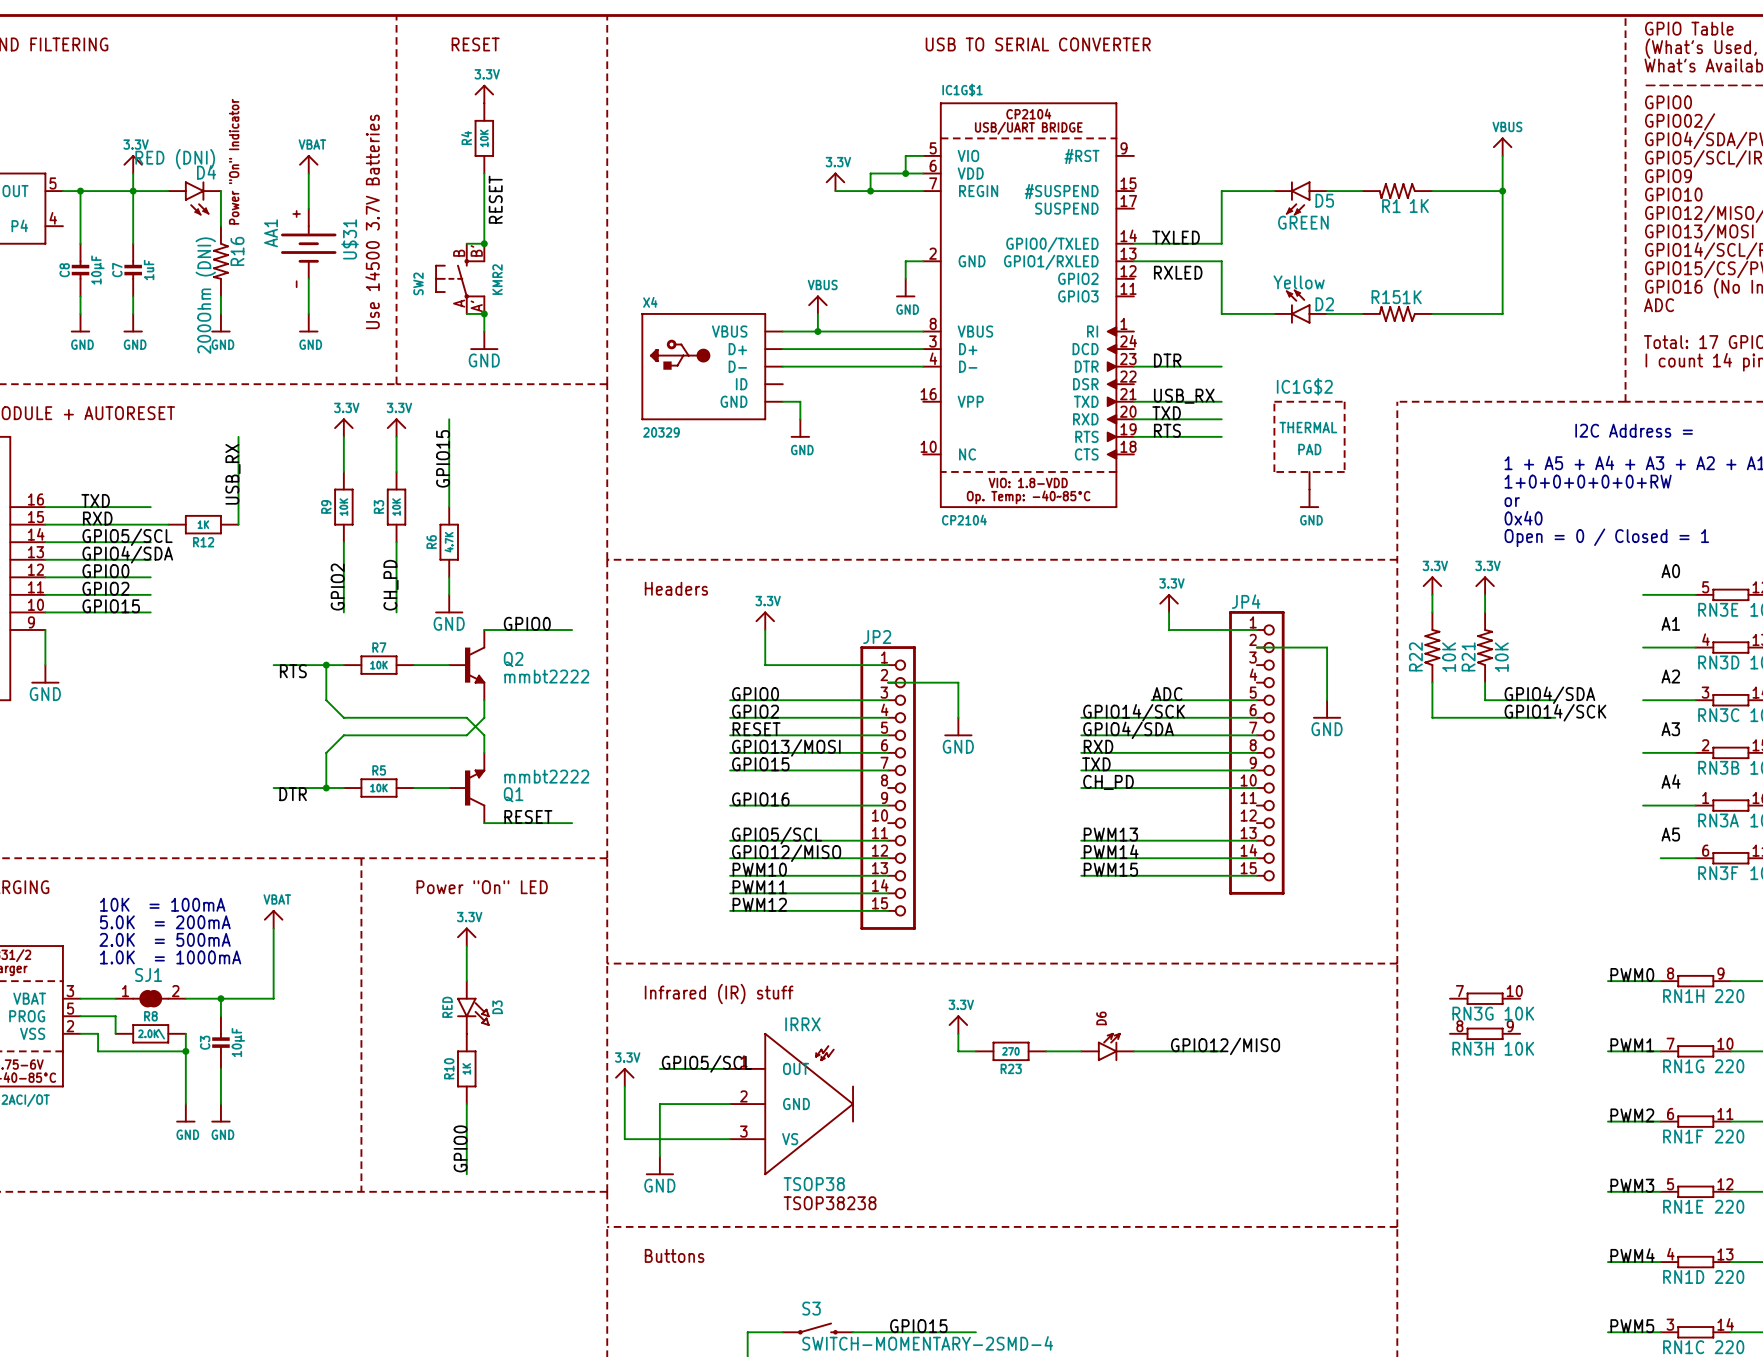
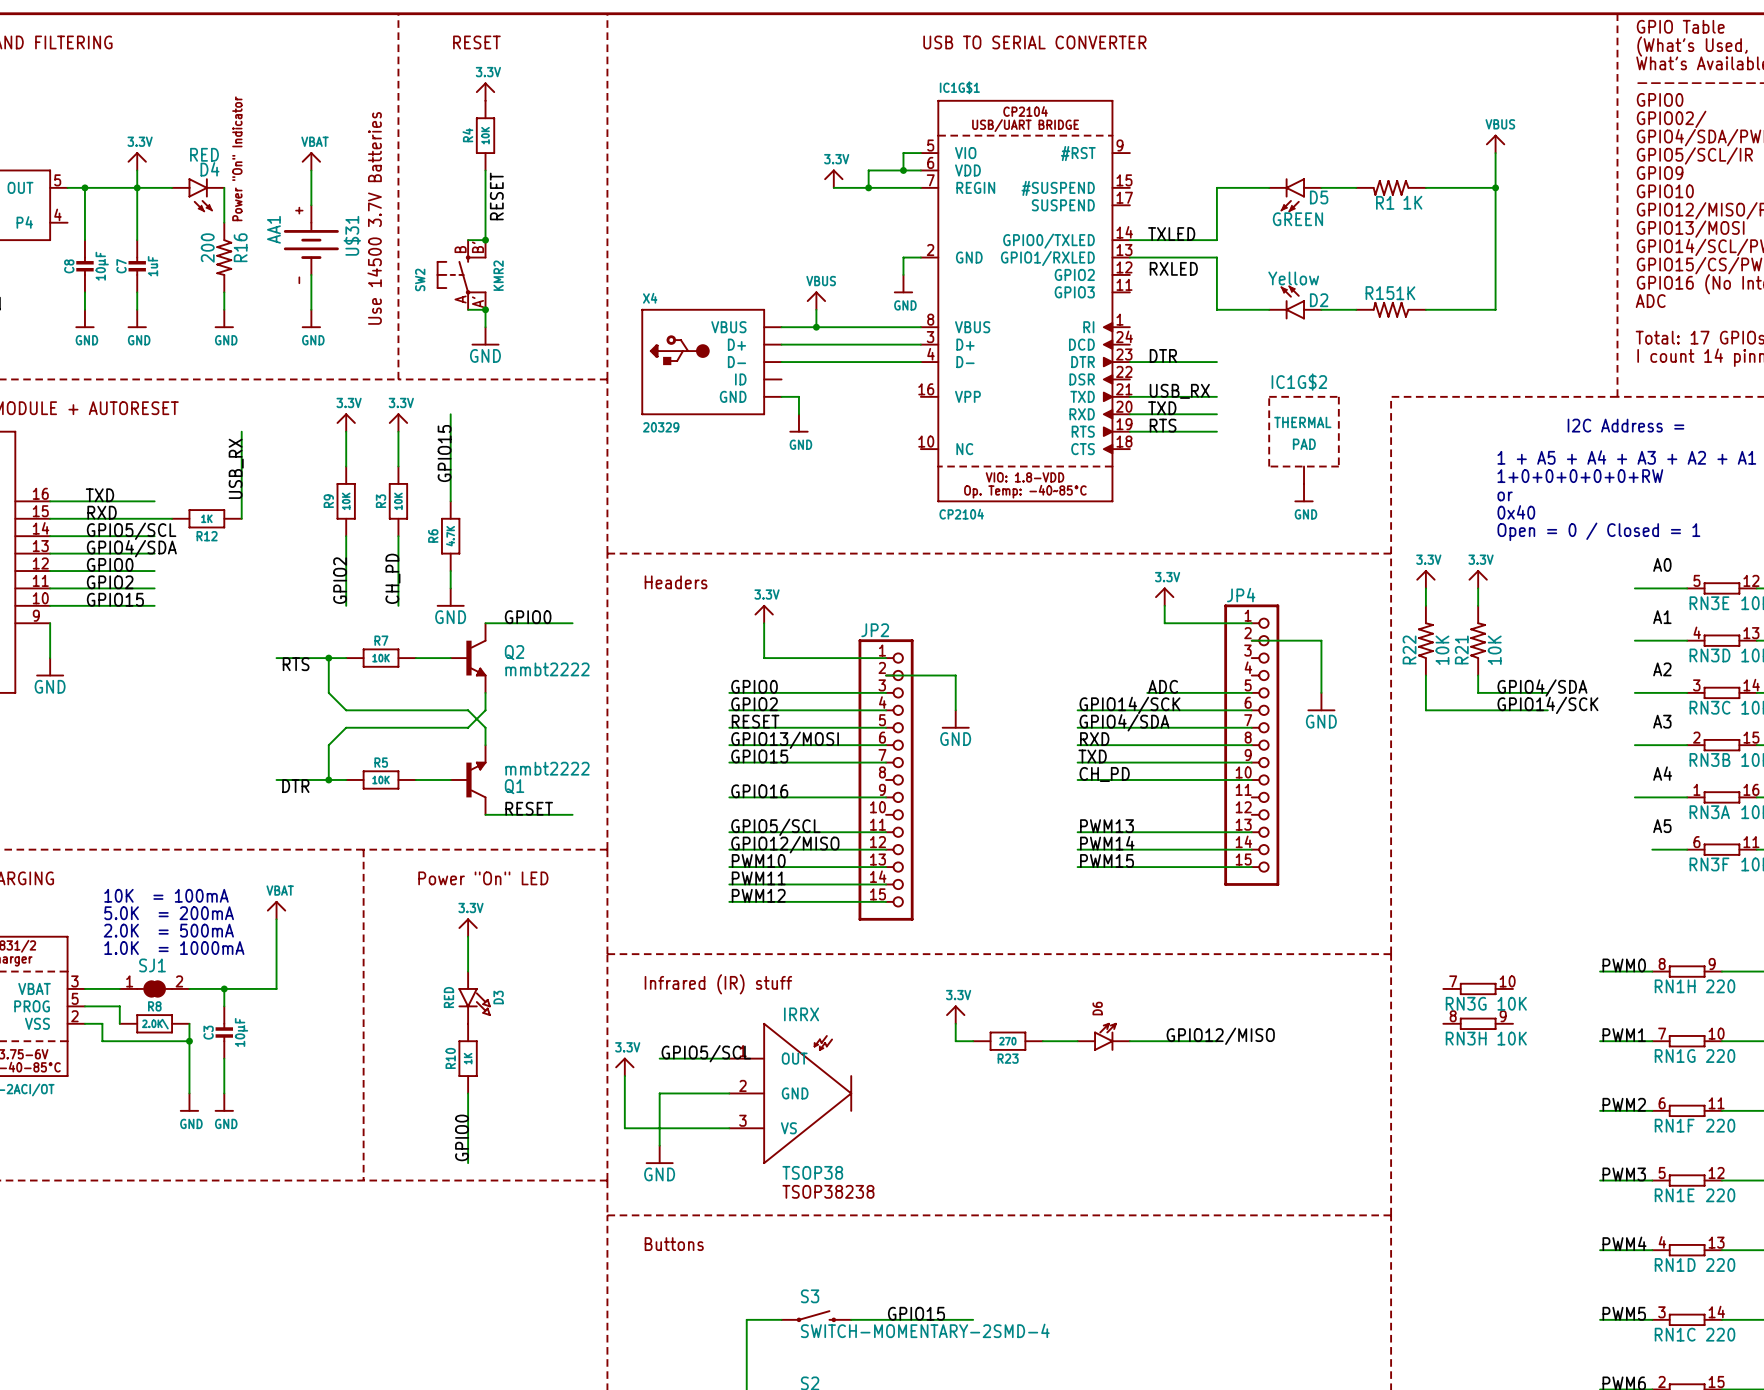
D4 value: RED (DNI) (175, 159) -> RED (204, 154)
R16 value: 200Ohm (DNI) (205, 295) -> 200 (207, 248)

